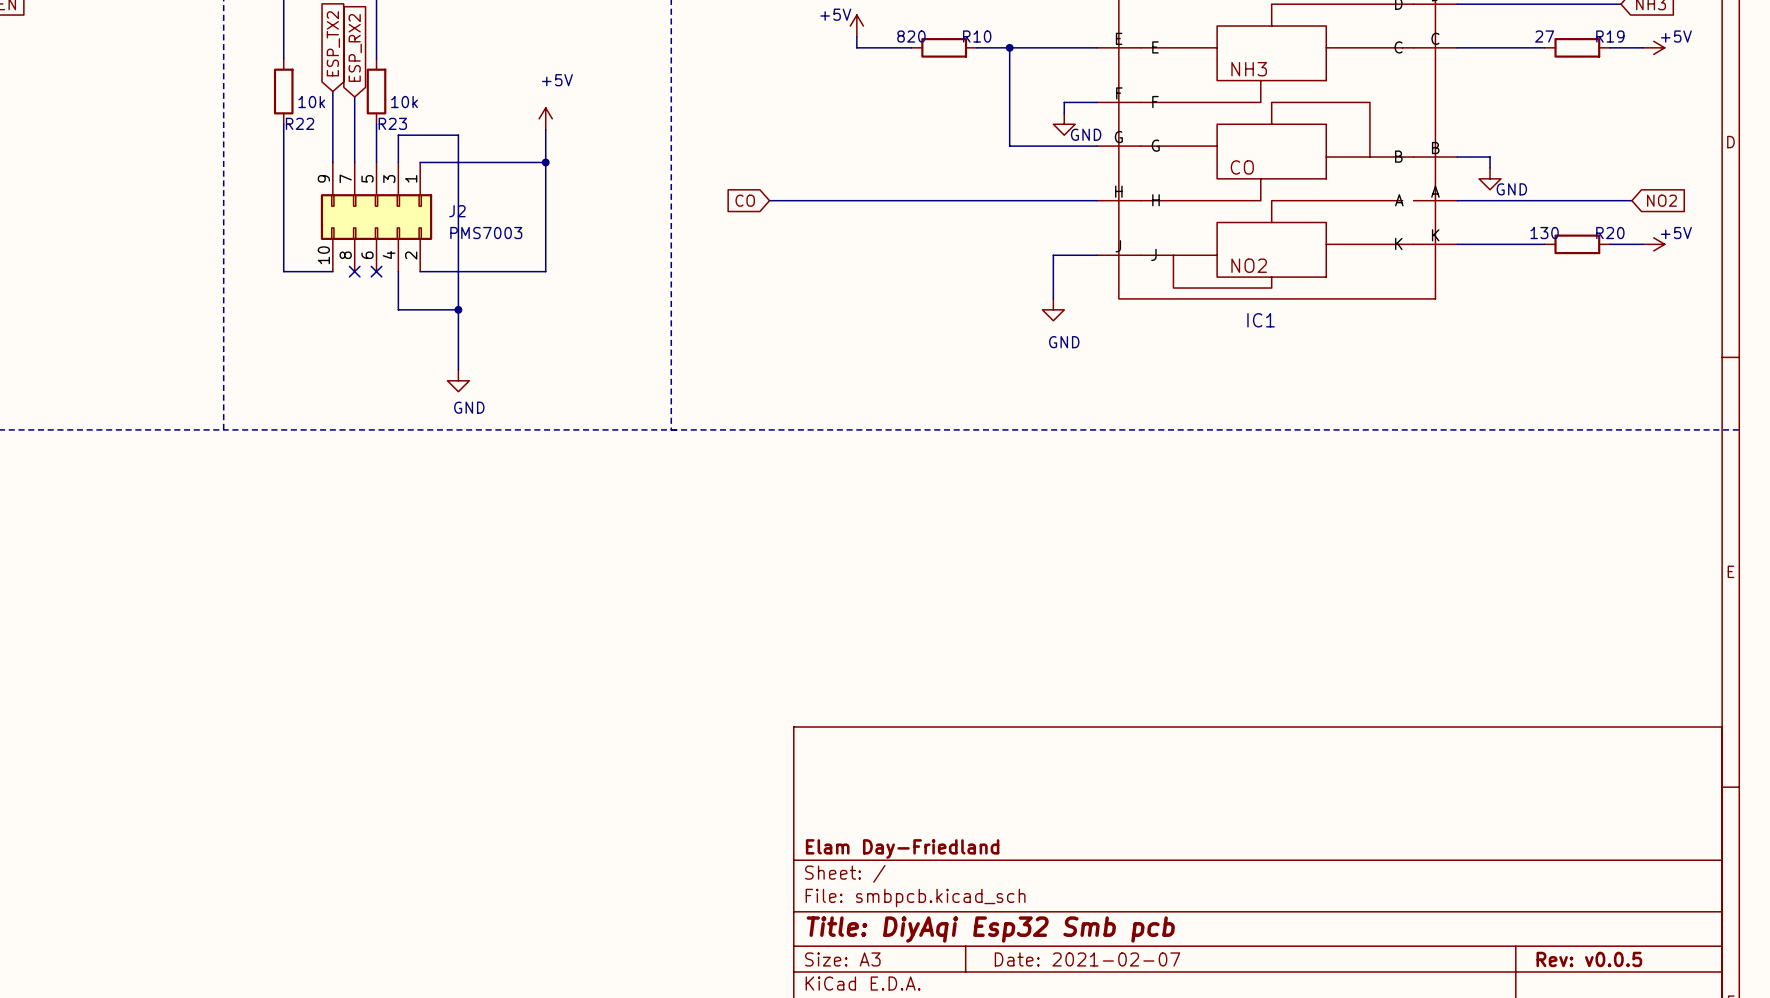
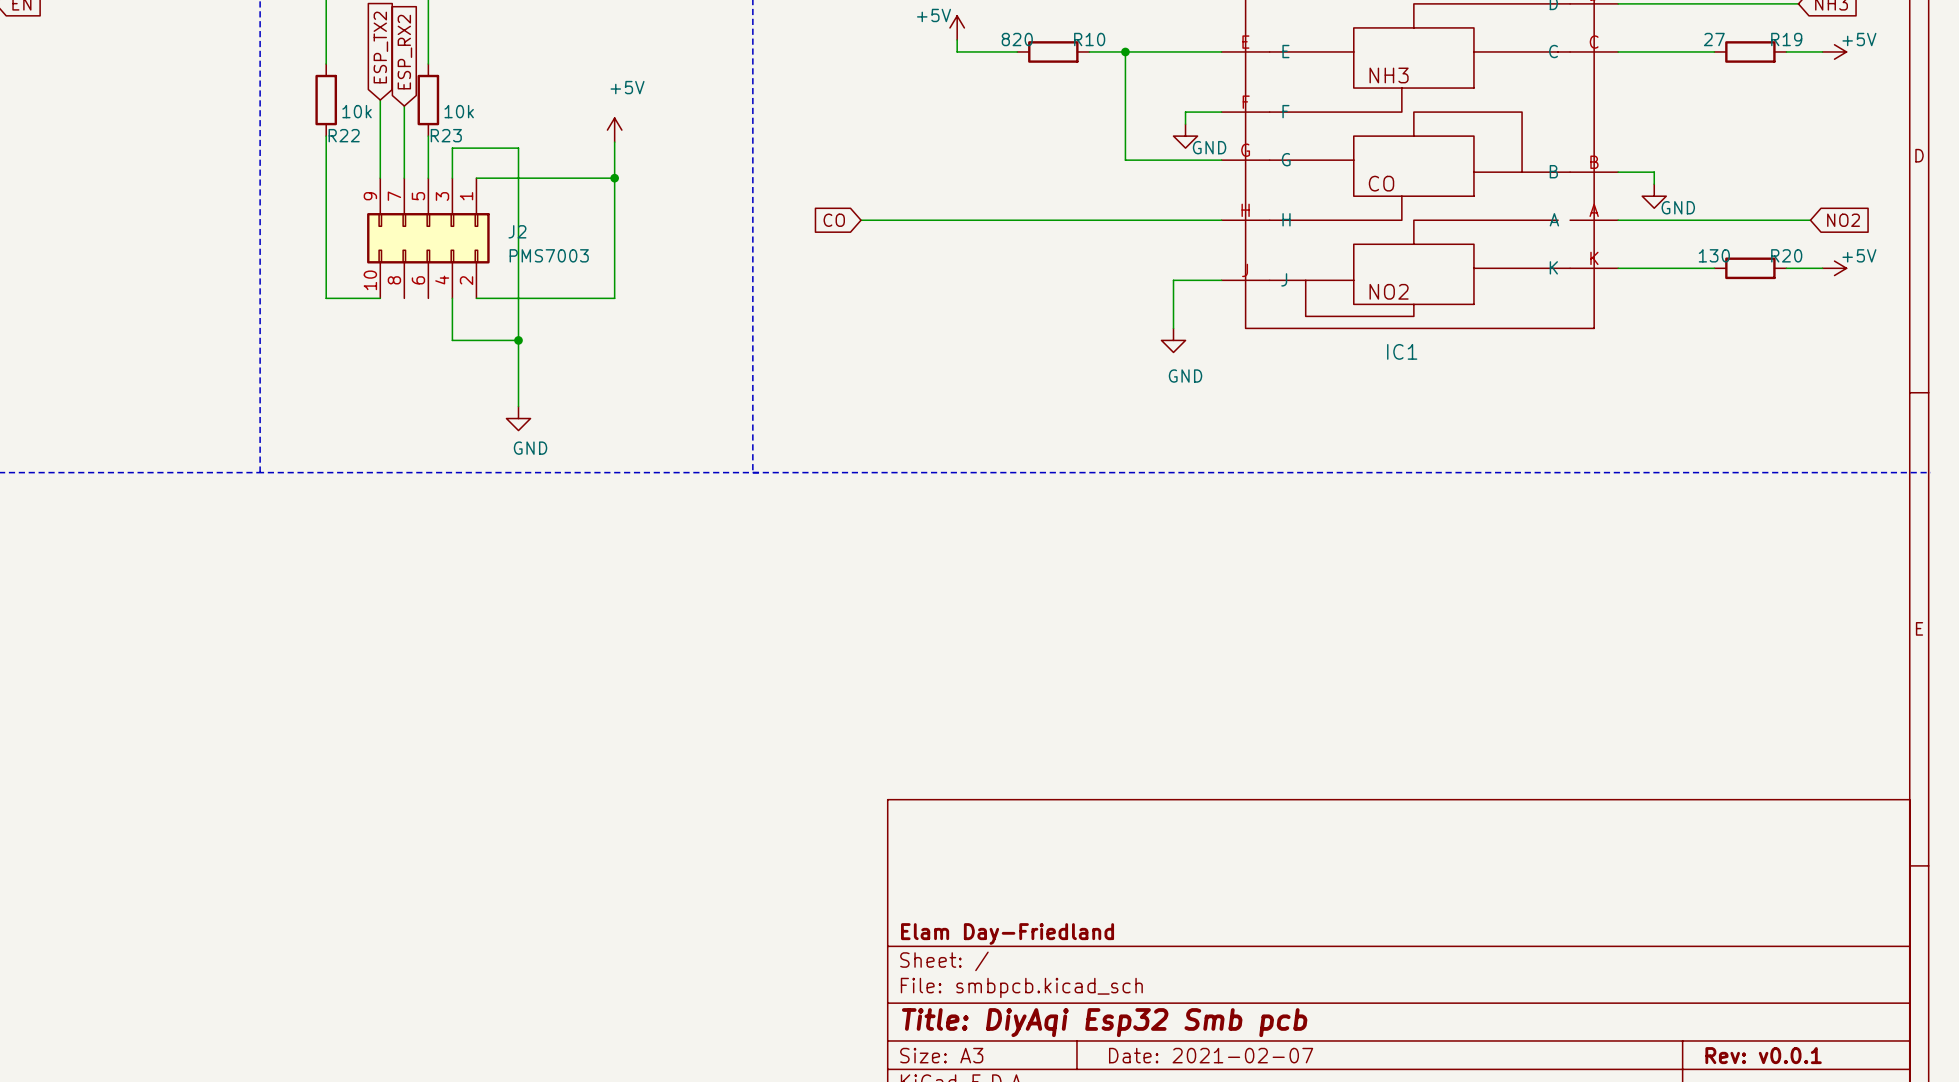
no-connect mark: (354, 271) -> none
no-connect mark: (376, 271) -> none
title block: Rev: v0.0.5 (1589, 959) -> Rev: v0.0.1 (1763, 1055)

